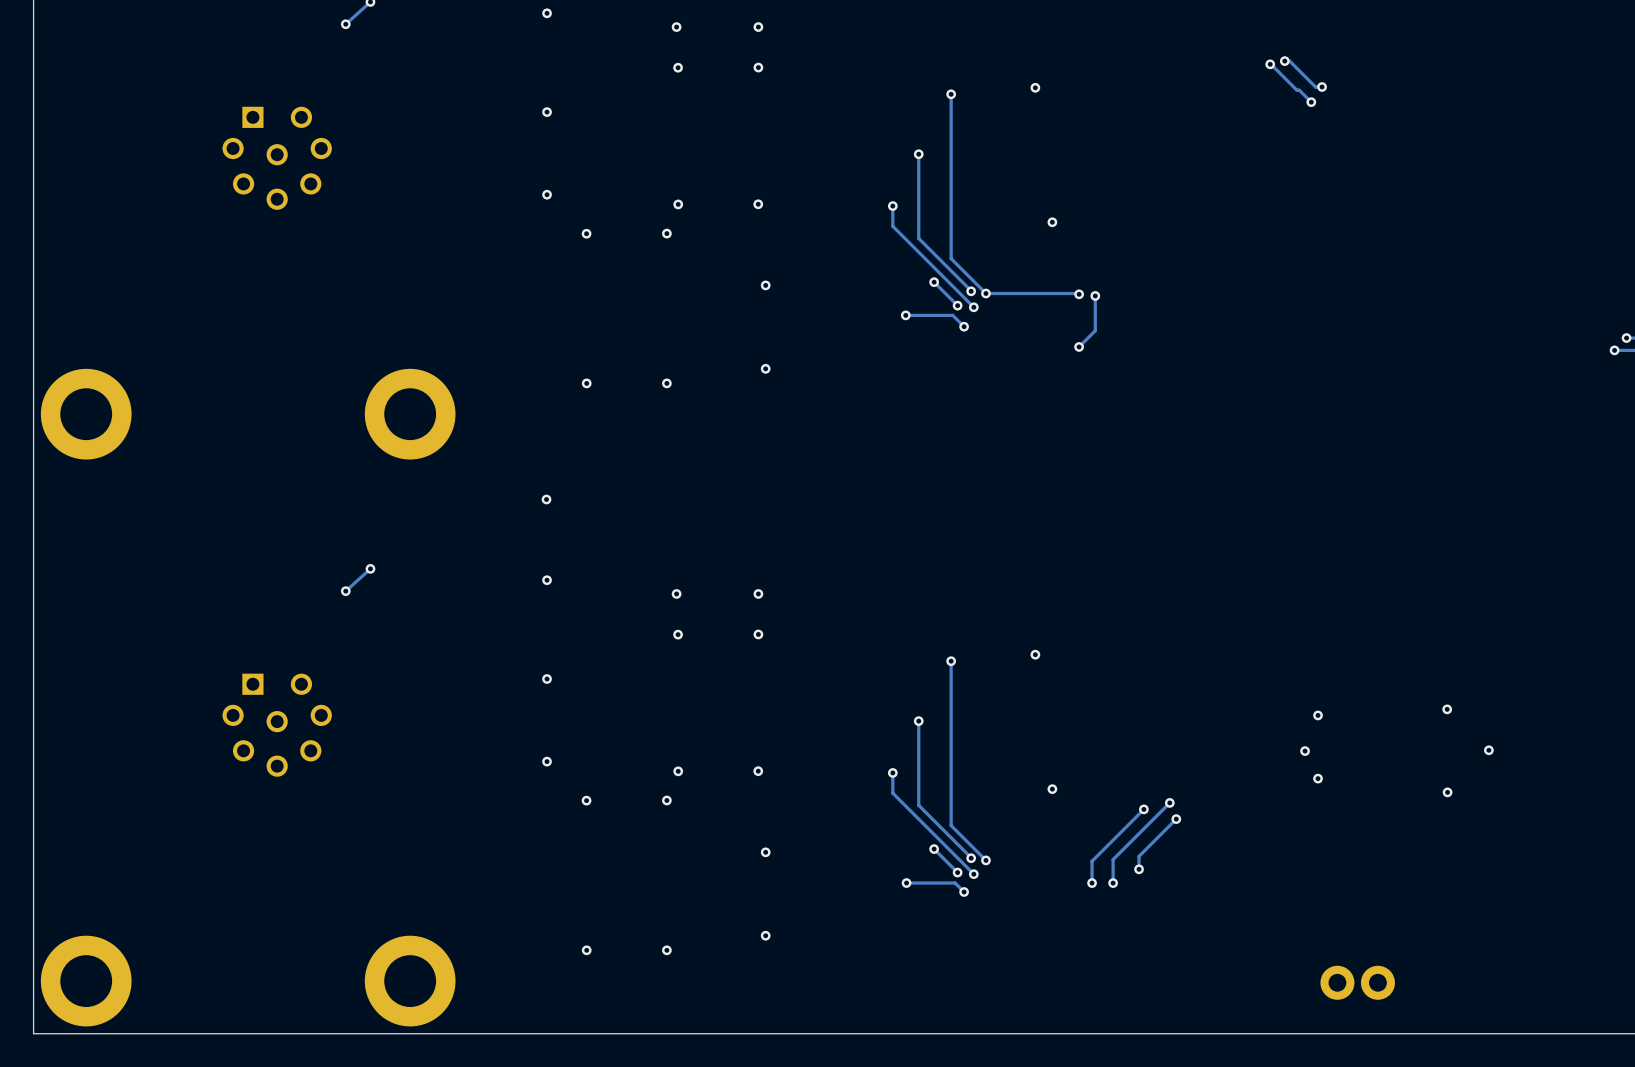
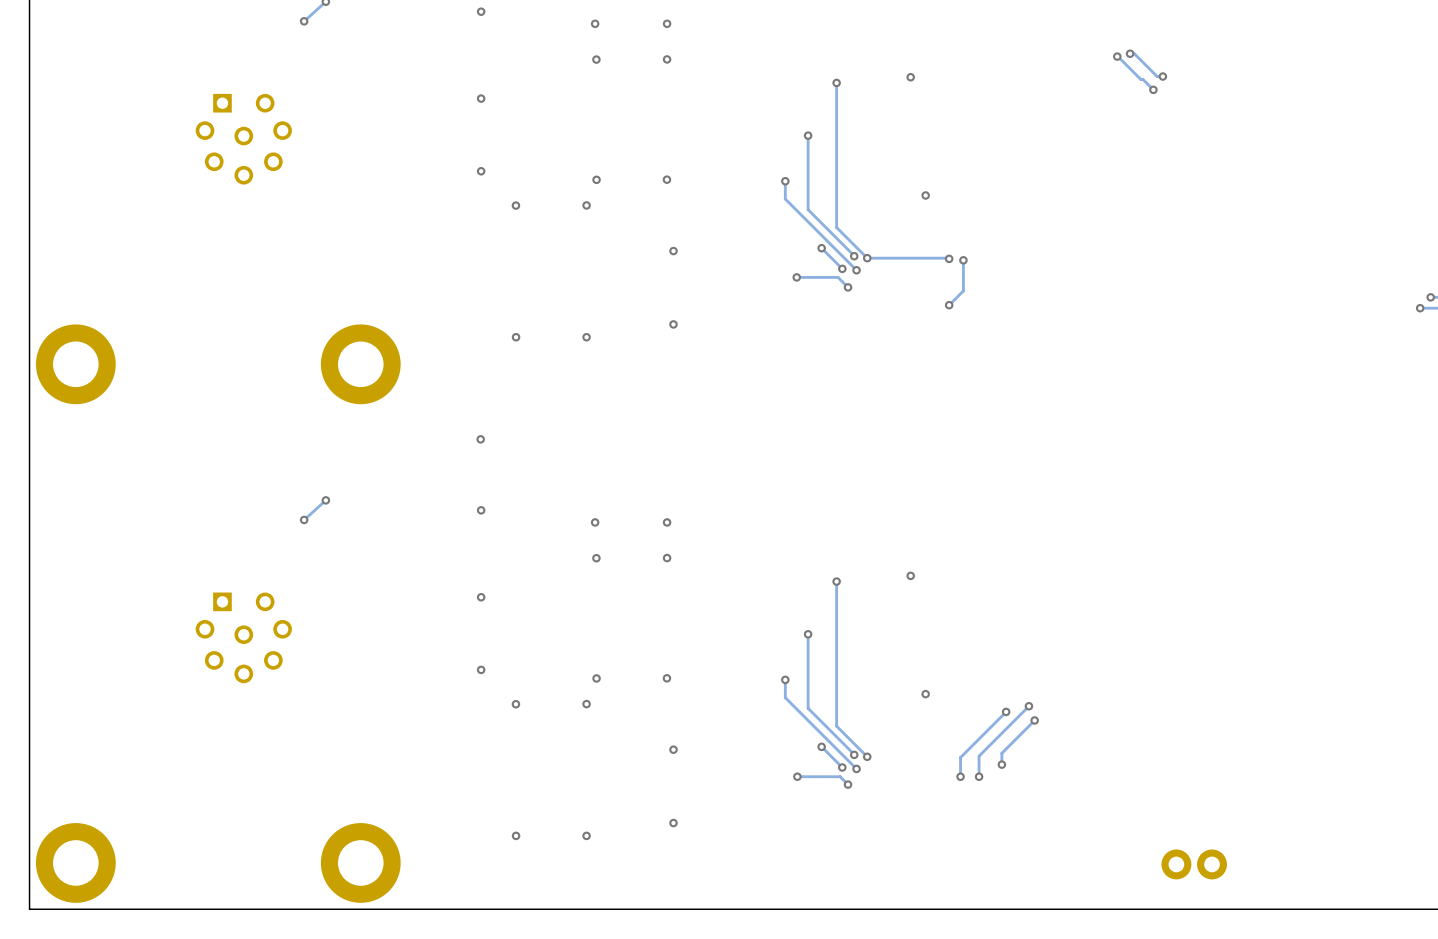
via: (1447, 709) -> none
via: (1318, 715) -> none
via: (1488, 750) -> none
via: (1305, 751) -> none
via: (1318, 778) -> none
via: (1447, 792) -> none

